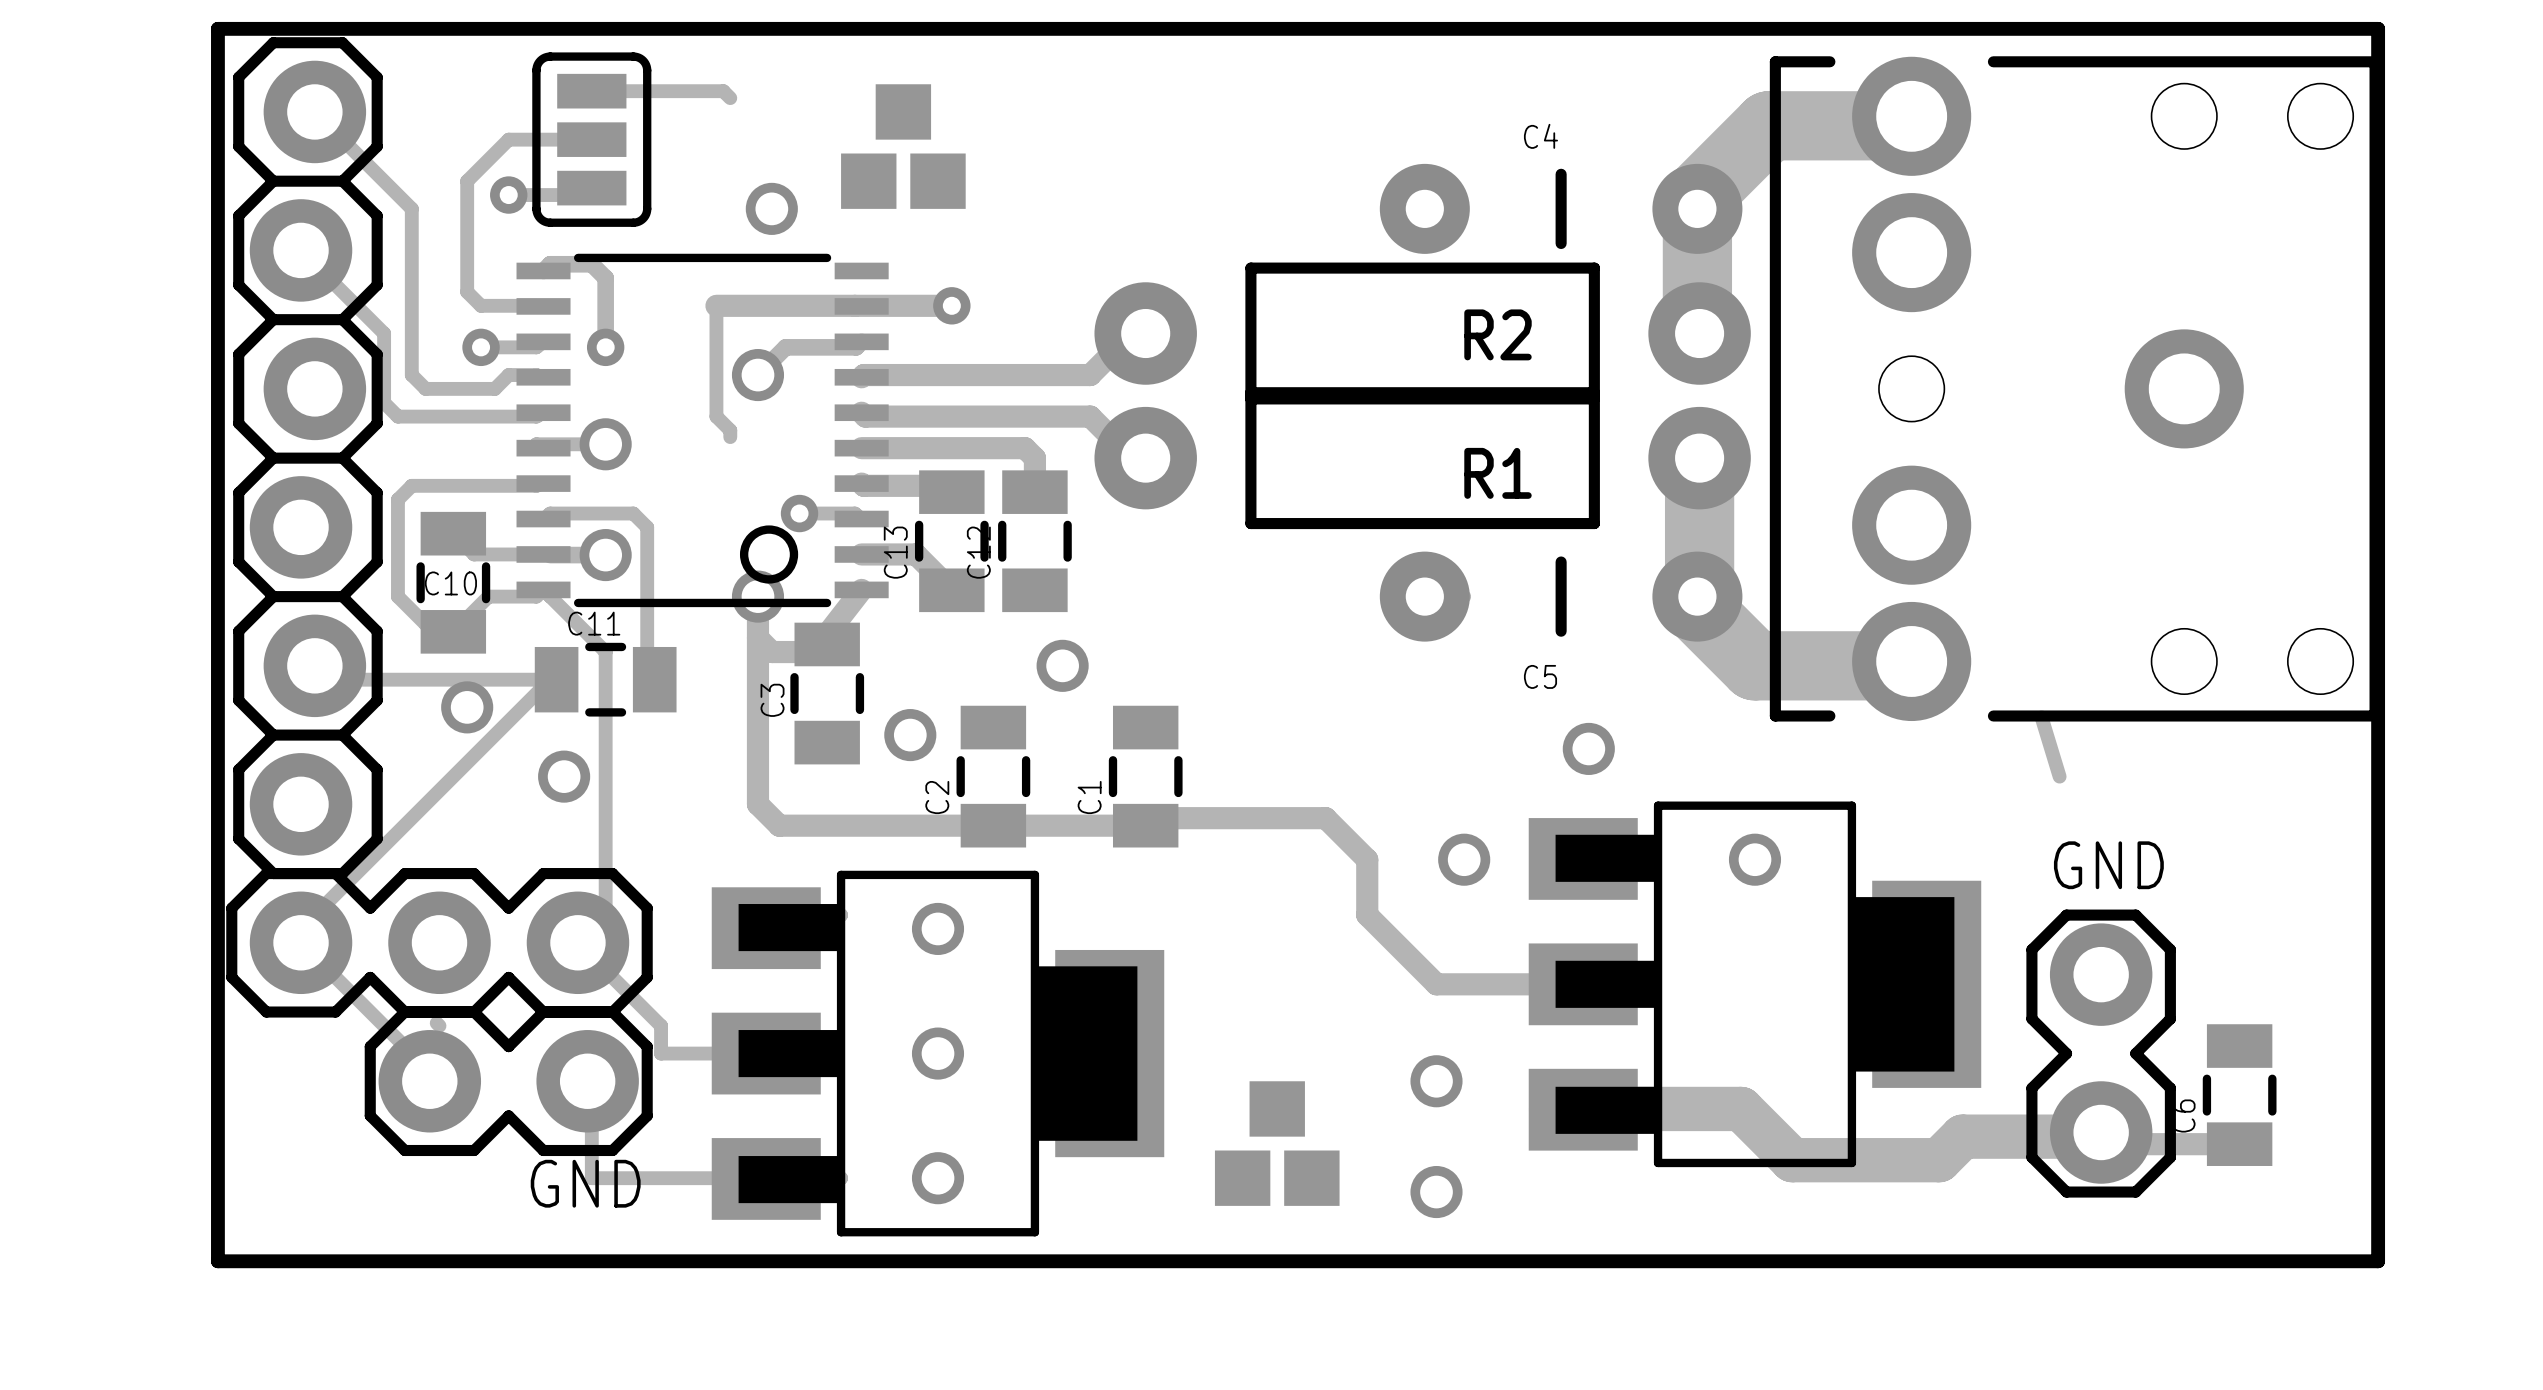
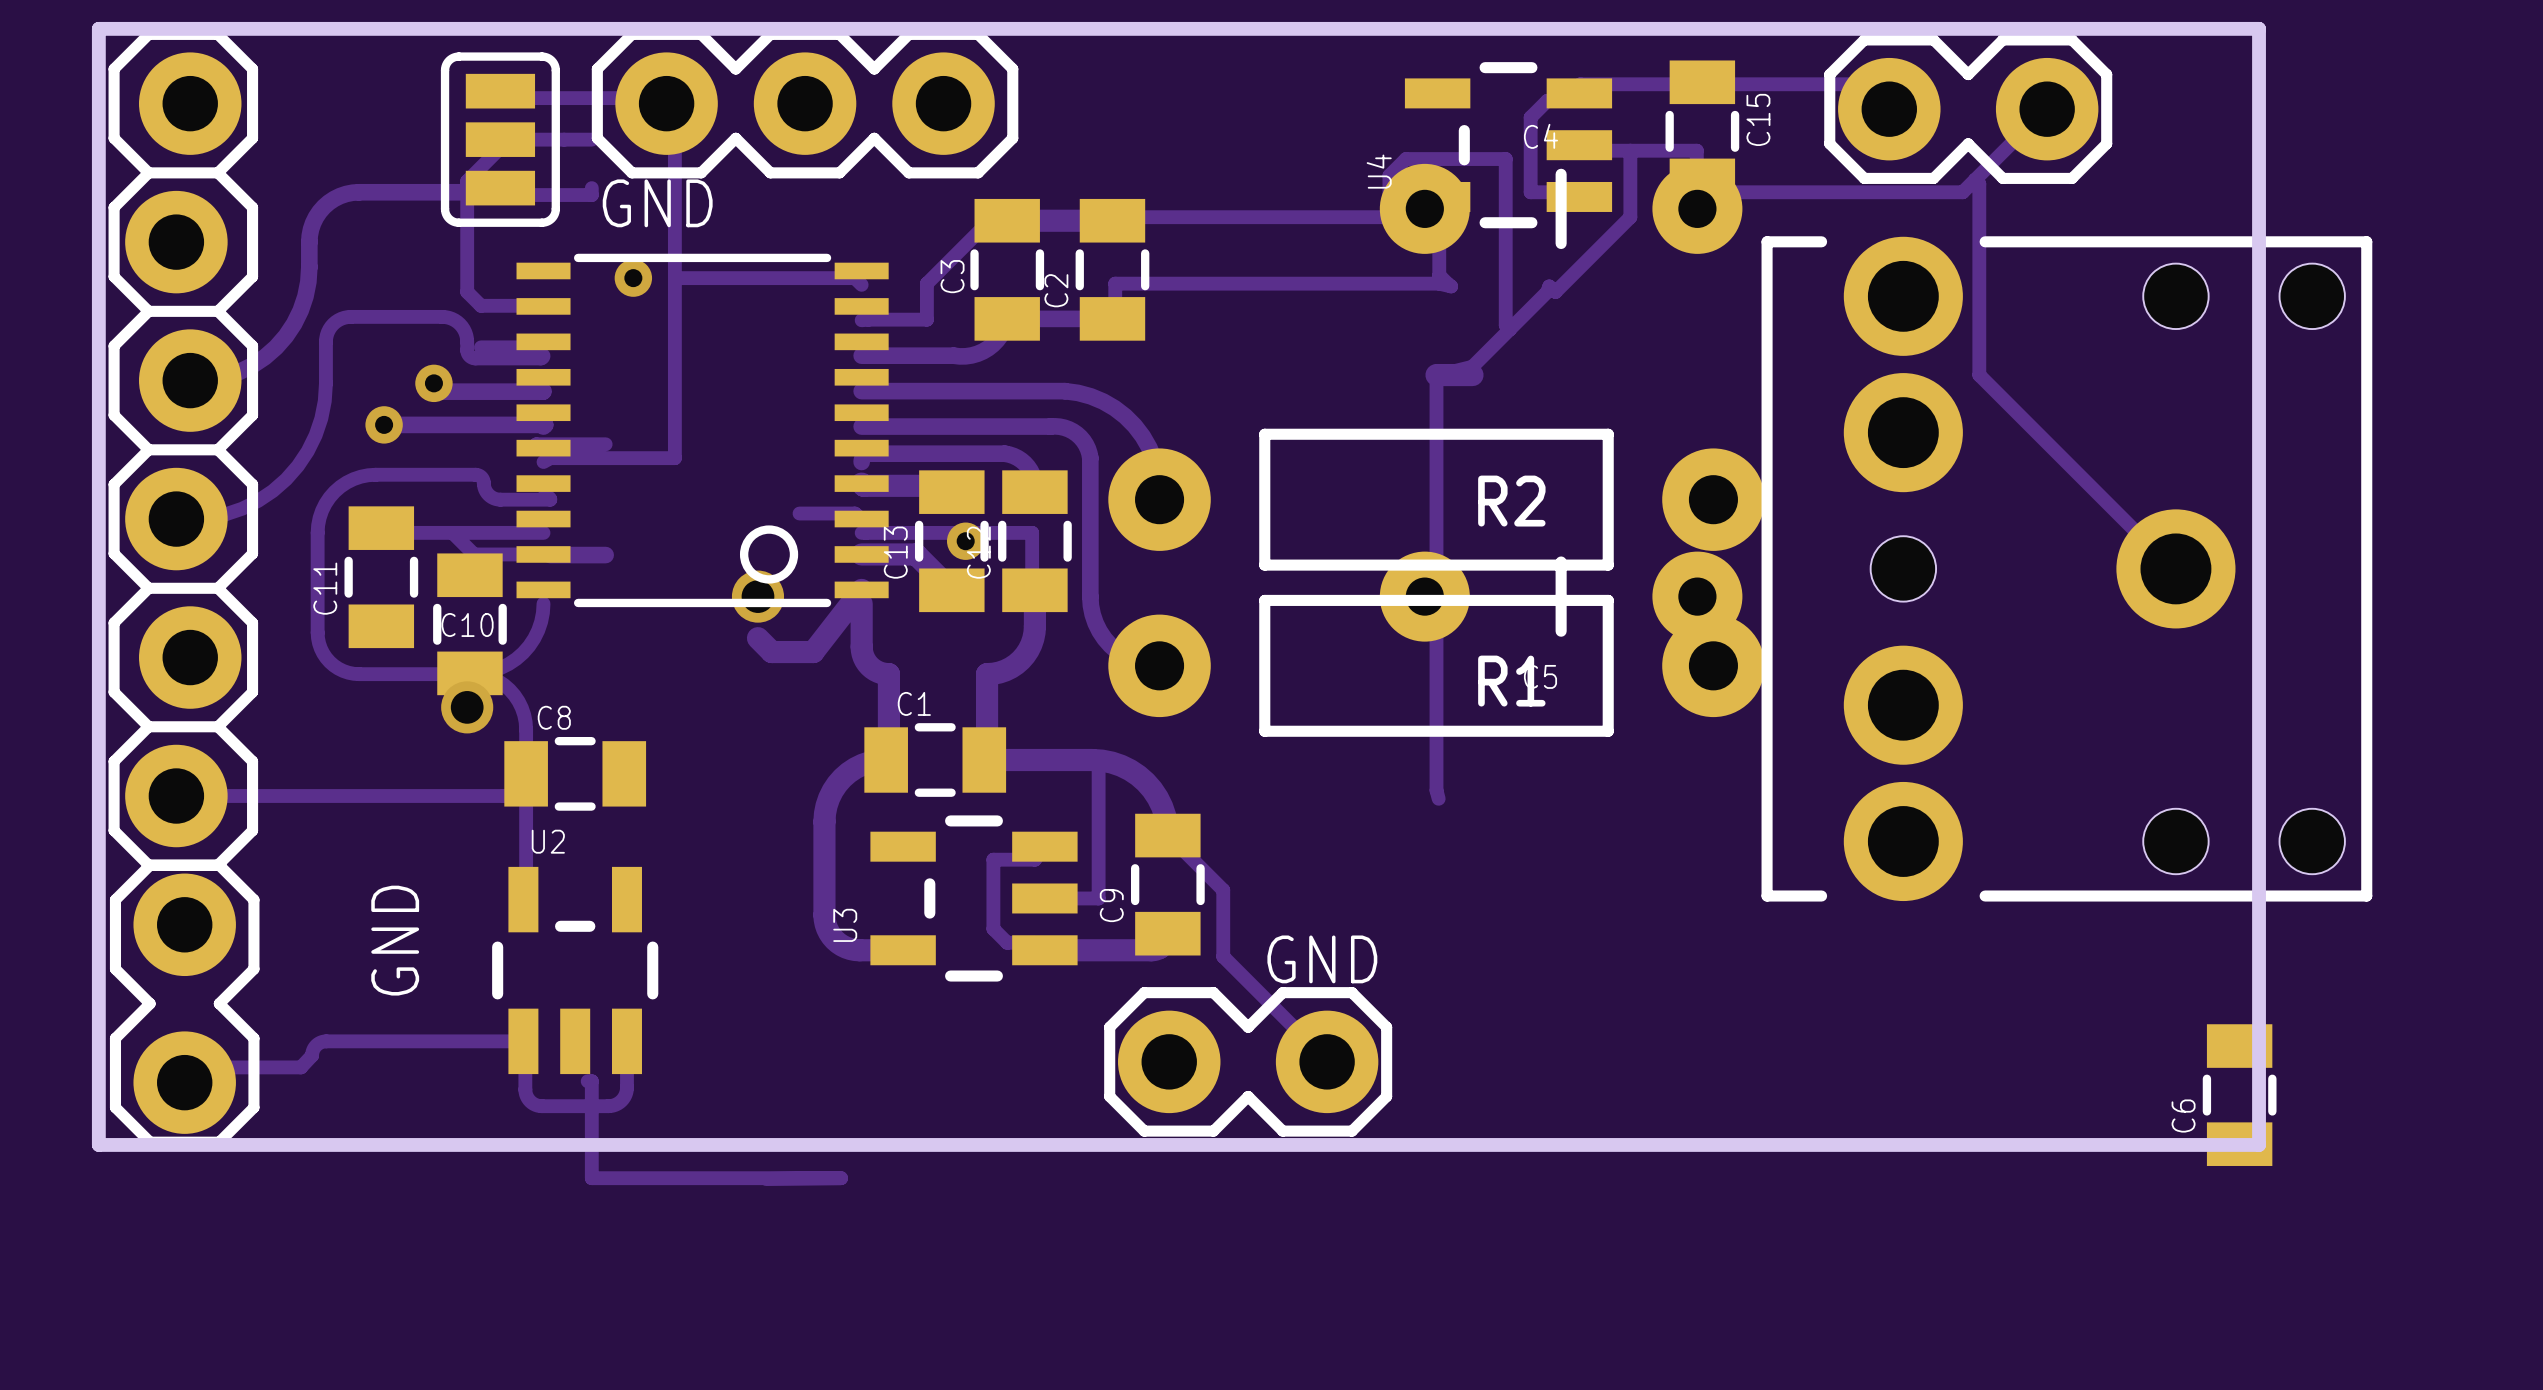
board edge: (217, 28) (217, 1261) (2378, 1261) (2378, 28) (2259, 28) -> (217, 28) (98, 28) (98, 1144) (2259, 1144) (2259, 28)
track: none -> (500, 91) (508, 98) (661, 98) (661, 111) (666, 103) (674, 111) (674, 458) (550, 458) (543, 462)
track: (591, 91) (723, 91) (730, 98) -> none
track: none -> (1889, 109) (1887, 84) (1705, 84) (1702, 82) (1696, 84) (1580, 84) (1580, 92) (1572, 100) (1547, 100) (1530, 117) (1530, 192) (1572, 192) (1579, 196)
part: none -> (1968, 109)
track: none -> (2047, 109) (1962, 192) (1705, 192) (1705, 183) (1696, 175) (1696, 150) (1580, 150) (1579, 145)
track: (314, 111) (411, 208) (411, 375) (425, 388) (494, 388) (508, 375) (536, 375) (543, 377) -> none
track: (1911, 116) (1902, 125) (1768, 125) (1697, 197) (1697, 331) (1699, 333) -> none
C15: none -> (1702, 131)
part position: (591, 139) -> (500, 139)
U4: none -> (1508, 145)
part: (903, 146) -> none
track: none -> (1630, 150) (1630, 217) (1555, 291) (1549, 286) (1547, 291) (1472, 366) (1438, 375)
track: none -> (1975, 179) (1979, 183) (1979, 375) (2170, 566) (2175, 568)
track: none -> (500, 188) (504, 192) (359, 192) (346, 193) (334, 198) (319, 211) (313, 223) (309, 235) (308, 281) (305, 296) (300, 310) (285, 336) (264, 357) (239, 371) (210, 379) (190, 380)
via: (508, 195) -> none
track: none -> (1437, 196) (1439, 200) (1439, 275) (1451, 286) (1439, 283) (1115, 283) (1115, 316) (1112, 318) (1007, 318) (1003, 330) (997, 340) (988, 348) (971, 355) (861, 355)
text: none -> GND (657, 203)
via: (771, 208) -> none
track: (301, 250) (384, 333) (384, 402) (397, 416) (536, 416) (543, 412) -> none
track: (543, 270) (550, 264) (591, 264) (605, 278) (605, 347) -> none
via: none -> (633, 278)
track: none -> (674, 278) (854, 278) (861, 284)
track: (937, 305) (716, 305) (716, 416) (730, 430) (730, 437) -> none
via: (951, 305) -> none
track: none -> (861, 320) (926, 319) (926, 283) (990, 219) (1112, 220) (1115, 217) (1389, 217) (1389, 175) (1406, 159) (1505, 159) (1505, 325) (1509, 329)
track: (1145, 333) (1131, 333) (1090, 375) (863, 375) (861, 377) -> none
R2 position: (1422, 333) -> (1436, 499)
track: (861, 341) (856, 347) (785, 347) (757, 375) -> none
via position: (481, 347) -> (433, 383)
via: (605, 347) -> none
track: none -> (543, 355) (540, 358) (472, 357) (467, 352) (466, 338) (463, 329) (454, 320) (445, 317) (350, 316) (341, 318) (333, 324) (326, 335) (324, 401) (321, 418) (307, 451) (297, 465) (272, 491) (242, 508) (207, 517) (176, 519)
via: (757, 375) -> none
track: none -> (1472, 375) (1436, 375) (1436, 790) (1438, 798)
track: none -> (433, 383) (436, 389) (441, 391) (543, 391)
part position: (2075, 388) -> (2066, 568)
track: none -> (861, 391) (1064, 391) (1090, 396) (1114, 408) (1134, 425) (1142, 436) (1154, 460) (1157, 473) (1159, 499)
track: (861, 412) (865, 416) (1090, 416) (1131, 458) (1145, 458) -> none
track: none -> (384, 424) (545, 424) (543, 426)
via: none -> (384, 424)
track: none -> (861, 426) (1055, 426) (1068, 429) (1076, 434) (1086, 444) (1090, 458) (1090, 596) (1095, 623) (1110, 645) (1124, 656) (1141, 663) (1159, 665)
via: (605, 444) -> none
track: (861, 448) (1024, 448) (1034, 458) (1034, 492) -> (861, 462) (864, 456) (869, 453) (1004, 453) (1017, 457) (1027, 466) (1033, 478) (1034, 492)
part position: (307, 458) -> (183, 449)
R1 position: (1422, 458) -> (1436, 665)
track: (1699, 458) (1699, 594) (1697, 596) (1697, 608) (1754, 665) (1907, 665) (1911, 661) -> none
track: (543, 483) (536, 485) (411, 485) (397, 499) (397, 596) (425, 624) (453, 624) -> none
track: none -> (543, 497) (548, 497) (550, 499) (496, 499) (487, 493) (482, 478) (476, 474) (375, 474) (360, 476) (340, 486) (329, 497) (322, 510) (317, 532) (317, 632) (320, 648) (329, 661) (343, 670) (353, 673) (469, 674)
via: (799, 513) -> none
track: (543, 519) (550, 513) (633, 513) (647, 527) (647, 672) (654, 679) (647, 679) -> none
track: none -> (381, 528) (386, 532) (543, 532)
track: none -> (861, 532) (1032, 532) (1032, 582) (1034, 590) (1033, 638) (1028, 650) (1016, 664) (1005, 670) (987, 674) (987, 757) (984, 760) (1092, 760)
via: none -> (965, 541)
via: (605, 555) -> none
C10 position: (453, 582) -> (469, 624)
track: (757, 596) (757, 804) (779, 825) (1145, 825) (1152, 818) (1325, 818) (1367, 859) (1367, 915) (1436, 984) (1583, 984) -> none
track: none -> (543, 603) (538, 630) (523, 652) (500, 668) (482, 672) (469, 673) (491, 677) (504, 684) (518, 701) (524, 715) (526, 729) (526, 896) (523, 899)
track: none -> (861, 603) (861, 646) (863, 657) (872, 668) (888, 674) (888, 757) (886, 759) (862, 764) (848, 772) (837, 784) (829, 798) (824, 821) (824, 919) (831, 936) (846, 947) (859, 950) (903, 950)
track: (453, 631) (488, 596) (536, 596) (543, 589) (605, 651) (605, 970) -> none
track: (314, 665) (314, 679) (564, 679) -> none
via: (1062, 665) -> none
track: (550, 679) (301, 928) (301, 942) (425, 1067) (425, 1081) (429, 1081) -> none
C11 rotation: 0° (605, 679) -> 90° clockwise (381, 577)
C11 position: (605, 679) -> (381, 577)
C3 position: (827, 693) -> (1007, 269)
track: (2041, 717) (2059, 776) -> none
via: (910, 735) -> none
via: (1588, 748) -> none
track: none -> (1092, 760) (1098, 765) (1098, 898) (1044, 898)
track: none -> (1092, 760) (1121, 765) (1145, 782) (1162, 806) (1167, 835)
track: none -> (526, 773) (524, 782) (519, 789) (512, 794) (503, 796) (176, 796)
C8: none -> (575, 773)
via: (564, 776) -> none
C2 position: (993, 776) -> (1112, 269)
C1 rotation: 0° (1145, 776) -> 90° clockwise (935, 760)
C1 position: (1145, 776) -> (935, 760)
track: none -> (1167, 835) (1223, 890) (1223, 956) (1327, 1061)
track: none -> (1044, 846) (1034, 859) (993, 859) (993, 928) (1007, 942) (1034, 942) (1044, 950) (1152, 950) (1163, 945) (1167, 933)
via: (1464, 859) -> none
via: (1754, 859) -> none
text: GND (2108, 865) -> none
C9: none -> (1167, 884)
U3: none -> (974, 898)
via: (937, 928) -> none
part position: (439, 942) -> (805, 103)
track: (577, 942) (661, 1025) (661, 1053) (766, 1053) -> none
text: none -> GND (1322, 959)
U2: none -> (575, 970)
part: (1754, 984) -> none
track: (436, 1023) (439, 1025) -> none
track: none -> (626, 1041) (626, 1092) (619, 1102) (610, 1106) (541, 1106) (531, 1102) (525, 1091) (525, 1043) (523, 1041) (324, 1041) (316, 1045) (312, 1055) (301, 1067) (190, 1067) (190, 1081) (184, 1082)
part: (937, 1053) -> none
via: (937, 1053) -> none
part: (2101, 1053) -> none
part: none -> (1248, 1061)
part rotation: 0° (508, 1081) -> 90° clockwise (184, 1003)
part position: (508, 1081) -> (184, 1003)
via: (1436, 1081) -> none
track: (1584, 1108) (1741, 1108) (1792, 1160) (1939, 1160) (1962, 1136) (2069, 1136) (2101, 1132) (2085, 1144) (2239, 1144) -> none
part: (1277, 1143) -> none
via: (937, 1178) -> none
text rotation: 0° (585, 1183) -> 90° counterclockwise (395, 940)
text position: GND (585, 1183) -> GND (395, 940)
via: (1436, 1192) -> none

